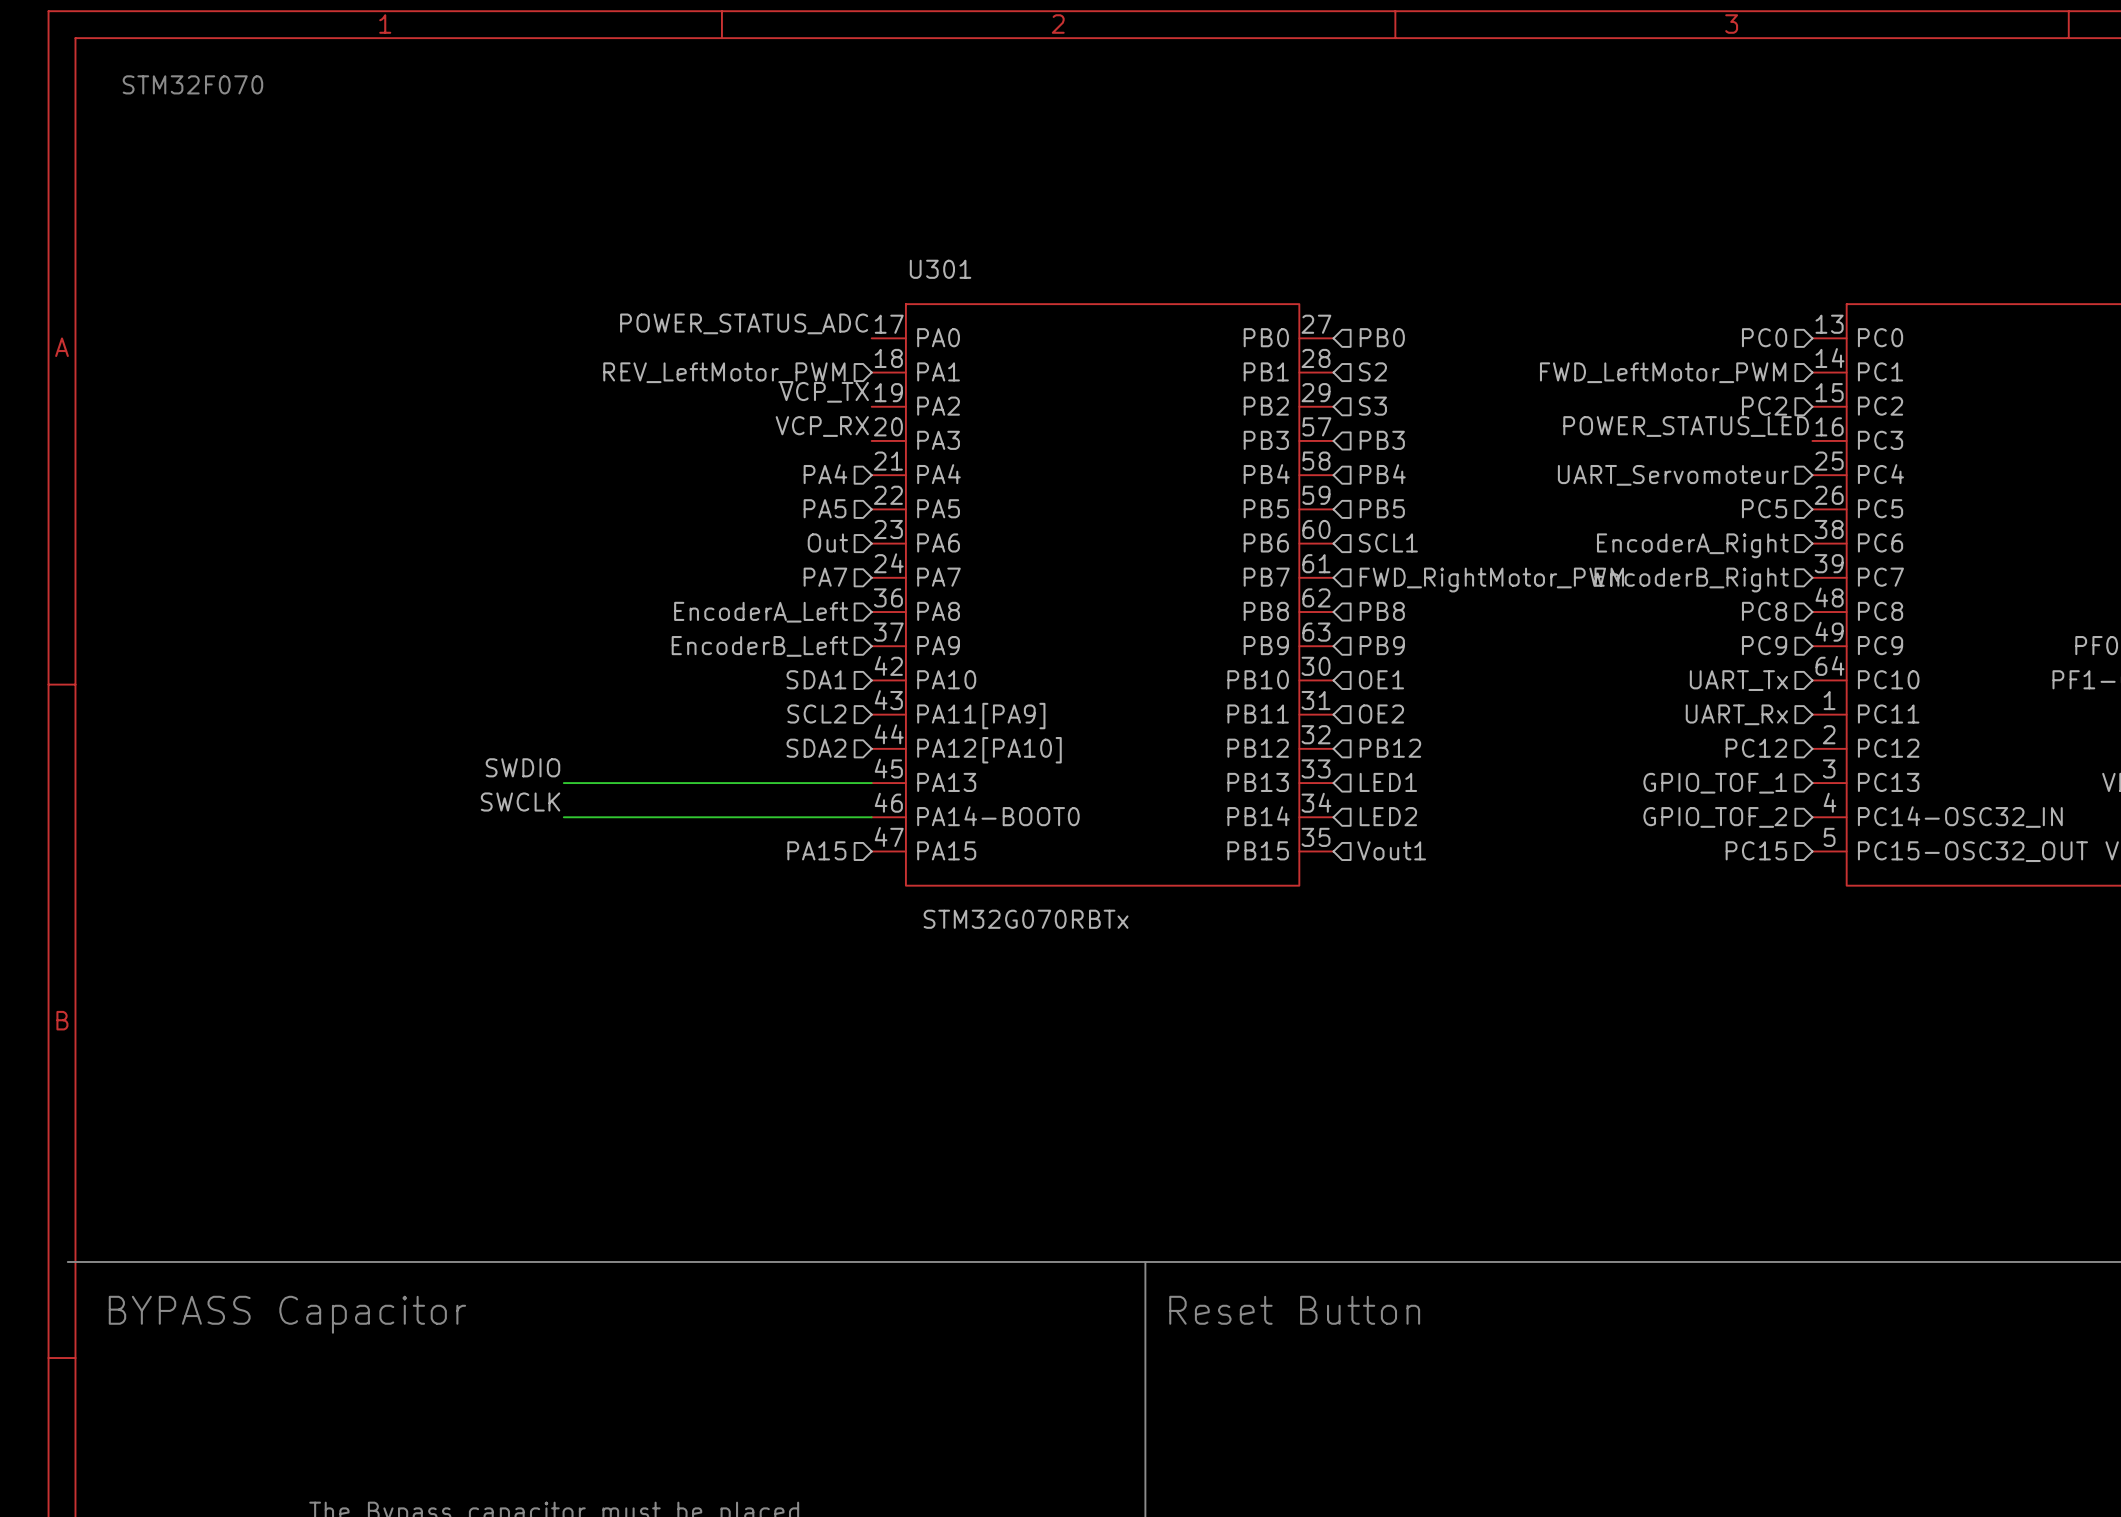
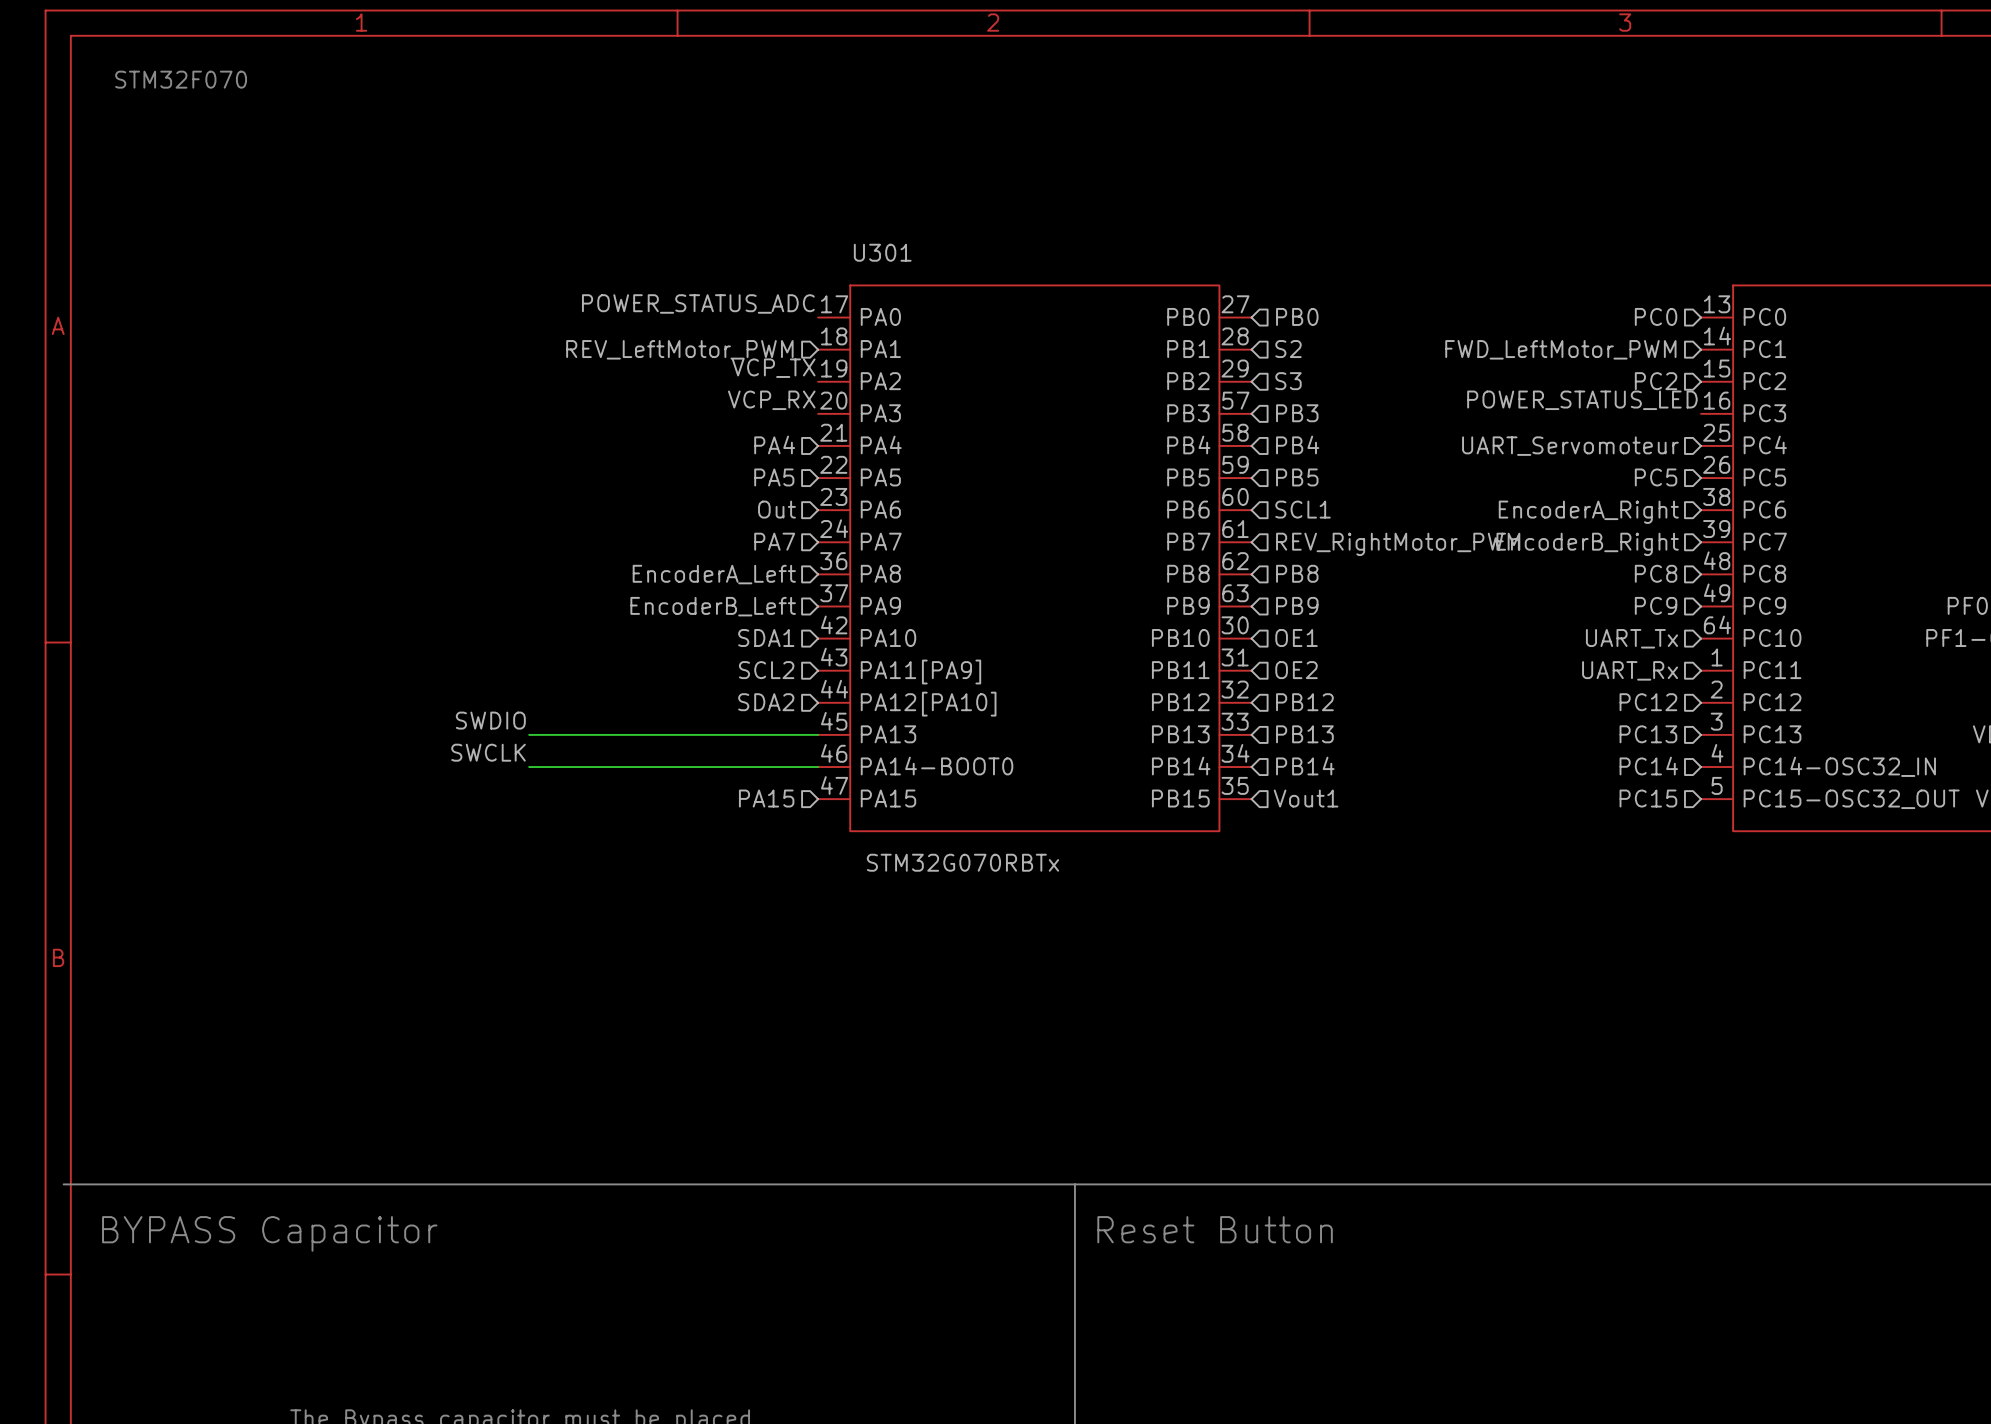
hierarchical label: FWD_RightMotor_PWM (1491, 580) -> REV_RightMotor_PWM (1398, 544)
hierarchical label: LED1 (1388, 782) -> PB13 (1304, 734)
hierarchical label: GPIO_TOF_1 (1715, 783) -> PC13 (1648, 734)
hierarchical label: LED2 (1388, 816) -> PB14 (1305, 766)
hierarchical label: GPIO_TOF_2 (1715, 817) -> PC14 (1648, 766)

